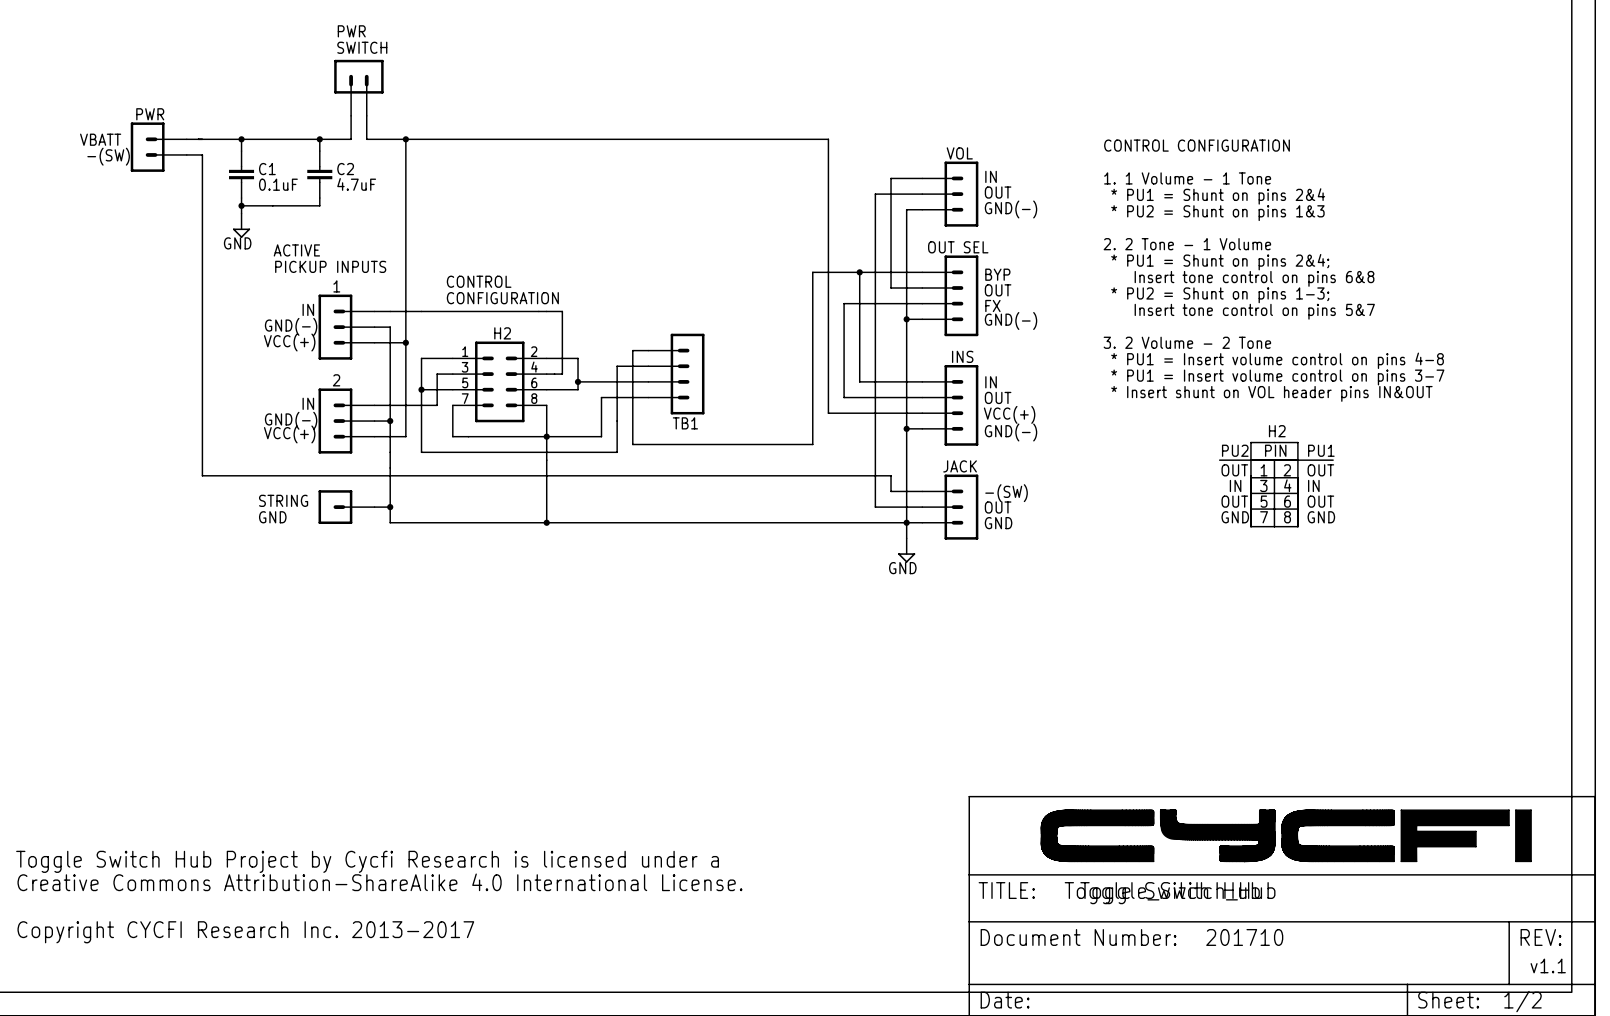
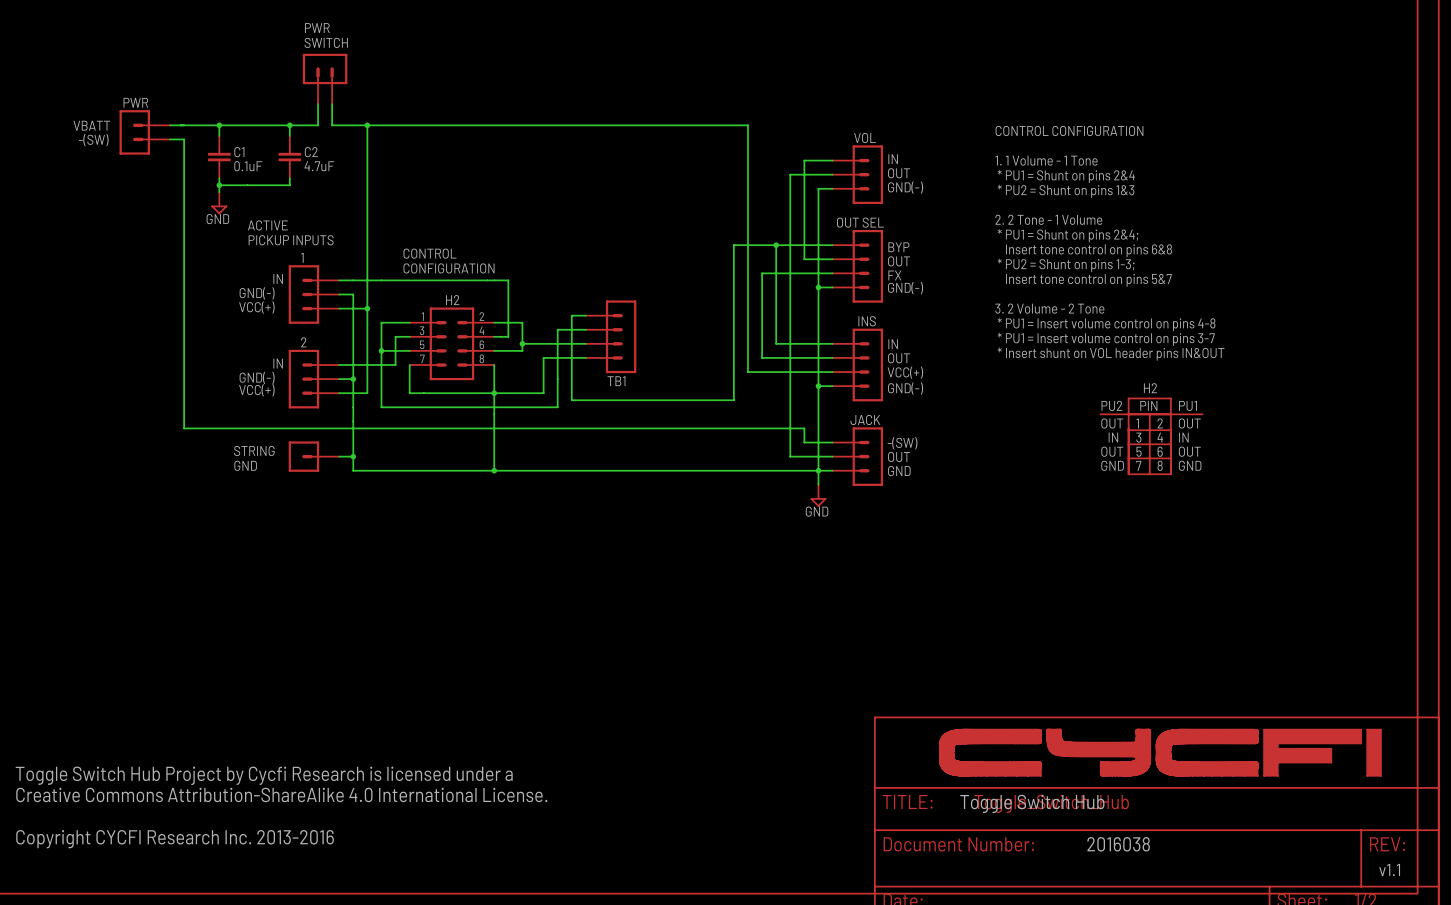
text: Copyright CYCFI Research Inc. 2013-2017 (245, 932) -> Copyright CYCFI Research Inc. 2013-2016 (175, 839)
text: 201710 (1244, 937) -> 2016038 (1118, 844)

